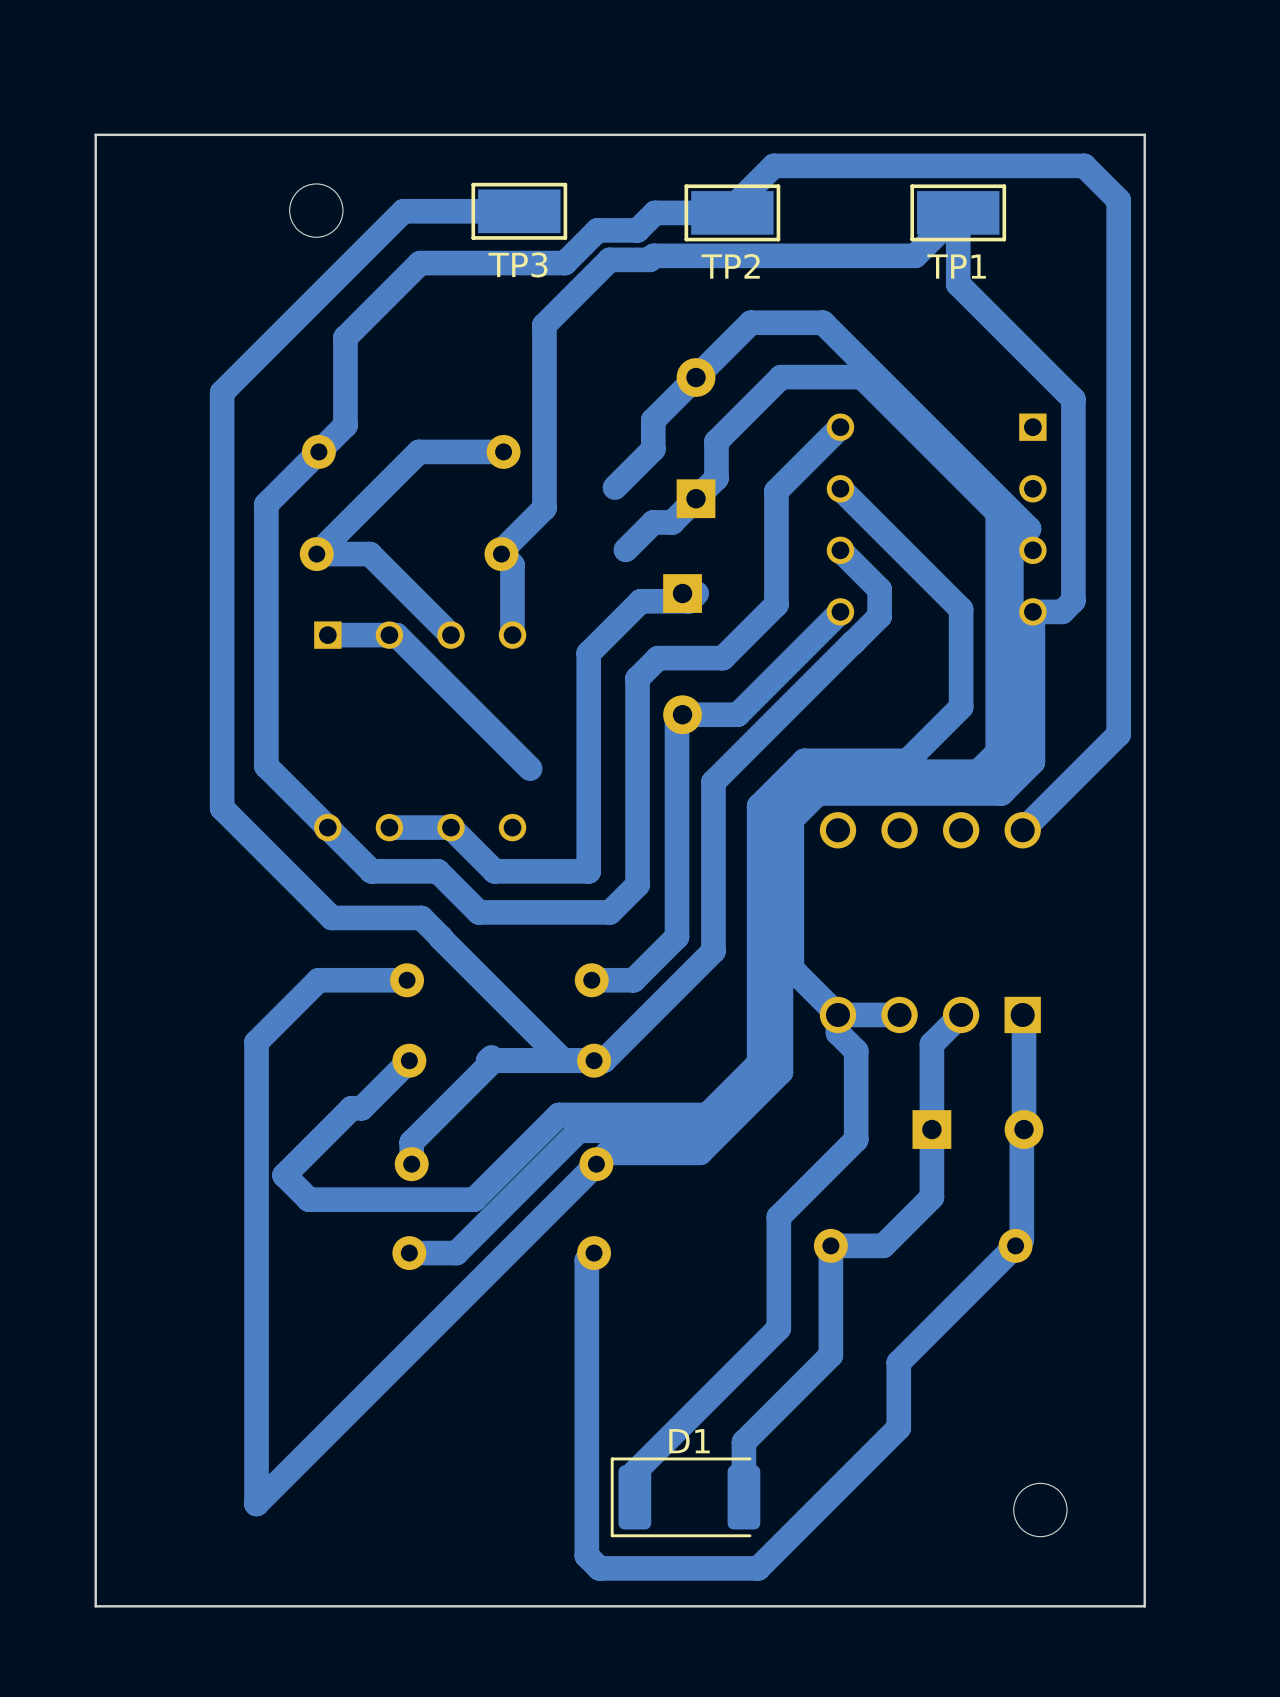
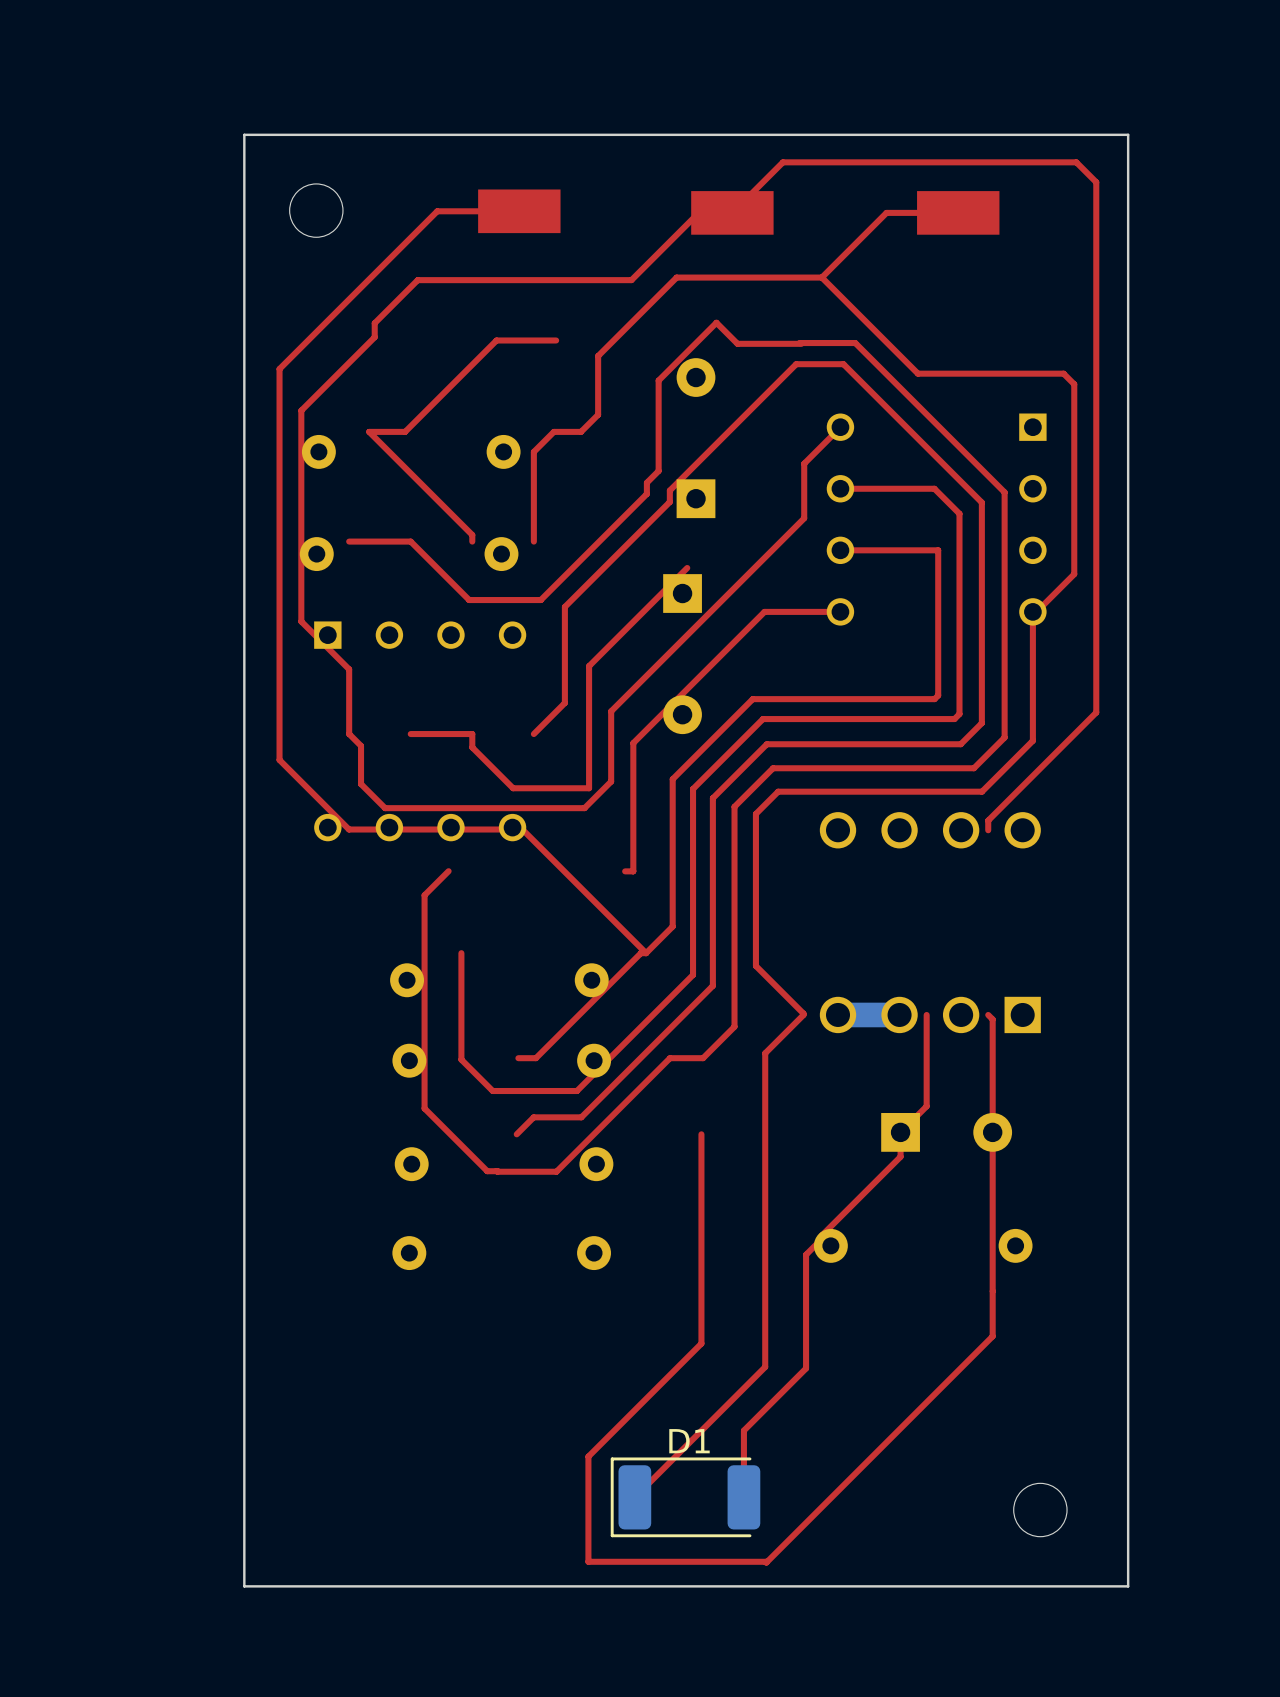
board edge: (1128, 134) (1144, 134) (1144, 1606) (95, 1606) (95, 134) (244, 134) -> (1128, 134) (1128, 1586) (244, 1586) (244, 134)
bottom track: (519, 211) (403, 211) (222, 392) (222, 808) (331, 917) (421, 917) (563, 1060) -> none
top track: none -> (519, 211) (437, 211) (279, 369) (279, 760) (349, 829) (522, 829) (646, 953)
TP3 side: bottom (519, 211) -> top (519, 211)
top track: none -> (732, 212) (782, 162) (1076, 162) (1096, 182) (1096, 712) (988, 820) (988, 830)
TP2 side: bottom (732, 212) -> top (732, 212)
top track: none -> (958, 212) (886, 212) (821, 277)
TP1 side: bottom (958, 212) -> top (958, 212)
top track: none -> (714, 214) (697, 214) (631, 280) (417, 280) (374, 323) (374, 337) (301, 410) (301, 621) (349, 669) (349, 734) (361, 745) (361, 784) (385, 808) (584, 808) (611, 781) (611, 711) (804, 518) (804, 463) (840, 427)
top track: none -> (821, 277) (676, 277) (598, 356) (598, 414) (581, 431) (553, 431) (533, 451) (533, 541)
top track: none -> (821, 277) (917, 373) (1063, 373) (1074, 384) (1074, 574) (1032, 615) (1032, 740) (982, 791) (778, 791) (755, 813) (755, 966) (803, 1013) (765, 1053) (765, 1367) (634, 1497)
top track: none -> (556, 340) (496, 340) (405, 431) (369, 431) (472, 534) (472, 541)
top track: none -> (799, 343) (855, 343) (1004, 492) (1004, 737) (973, 768) (773, 768) (734, 806) (734, 1026) (703, 1058) (670, 1058) (556, 1171) (496, 1170)
top track: none -> (801, 343) (737, 343) (716, 322) (658, 380) (658, 471) (646, 482) (646, 493) (540, 600) (469, 600) (410, 541) (349, 541)
bottom track: (840, 427) (776, 491) (776, 604) (722, 658) (658, 658) (637, 678) (637, 884) (610, 912) (478, 912) (437, 871) (371, 871) (266, 766) (266, 504) (345, 425) (345, 337) (420, 263) (564, 263) (597, 230) (637, 230) (655, 212) (732, 212) (732, 207) (773, 165) (1084, 165) (1118, 200) (1118, 734) (1022, 830) -> none
bottom track: (503, 451) (418, 451) (316, 554) (369, 554) (450, 635) -> none
bottom track: (614, 487) (653, 449) (653, 420) (750, 322) (823, 322) (1029, 528) (1023, 528) (1011, 541) (1011, 620) (1022, 631) (1022, 757) (996, 782) (813, 782) (780, 815) (780, 1072) (700, 1152) (607, 1152) (256, 1504) (256, 1042) (318, 980) (407, 980) -> none
bottom track: (840, 488) (961, 609) (961, 707) (907, 760) (804, 760) (759, 806) (759, 1063) (707, 1114) (558, 1114) (474, 1199) (308, 1199) (284, 1175) (351, 1108) (361, 1108) (407, 1062) (407, 1057) -> none
top track: none -> (840, 488) (934, 488) (959, 513) (959, 714) (954, 719) (762, 719) (693, 789) (693, 974) (576, 1091) (492, 1091) (461, 1059) (461, 953)
bottom track: (625, 549) (653, 522) (672, 522) (716, 478) (716, 441) (781, 377) (861, 377) (997, 512) (997, 752) (978, 771) (808, 771) (770, 810) (770, 1067) (706, 1130) (578, 1130) (456, 1253) (409, 1253) -> none
bottom track: (840, 550) (879, 589) (879, 616) (853, 642) -> none
top track: none -> (840, 550) (938, 550) (938, 695) (934, 699) (752, 699) (672, 779) (672, 926) (646, 953)
top track: none -> (687, 567) (589, 666) (589, 788) (513, 788) (472, 747) (472, 734) (410, 734)
bottom track: (696, 593) (688, 601) (640, 601) (588, 653) (588, 871) (494, 871) (450, 827) (389, 827) -> none
bottom track: (840, 611) (737, 714) (677, 714) (677, 936) (633, 980) (591, 980) -> none
top track: none -> (840, 611) (764, 611) (633, 743) (633, 871)
bottom track: (327, 635) (396, 635) (530, 768) -> none
bottom track: (512, 635) (512, 565) (501, 554) (501, 551) (544, 508) (544, 325) (609, 259) (649, 259) (653, 255) (915, 255) (958, 212) (958, 284) (1073, 399) (1073, 600) (1062, 611) (1032, 611) (1032, 762) (1001, 793) (817, 793) (791, 819) (791, 968) (838, 1014) (838, 1032) (856, 1051) (856, 1139) (778, 1216) (778, 1328) (634, 1472) (634, 1497) -> none
bottom track: (852, 642) (713, 782) (713, 951) (603, 1060) (488, 1060) (491, 1057) -> none
top track: none -> (533, 734) (564, 703) (564, 606) (669, 501) (669, 490) (796, 364) (843, 364) (981, 502) (981, 723) (960, 744) (766, 744) (712, 798) (712, 985) (581, 1117) (533, 1117) (516, 1134)
top track: none -> (448, 871) (424, 895) (424, 1108) (487, 1171) (497, 1171)
top track: none -> (633, 871) (625, 871)
top track: none -> (646, 953) (640, 953) (535, 1058) (518, 1058)
top track: none -> (926, 1014) (926, 1106) (900, 1132) (900, 1156) (822, 1235) (822, 1238) (806, 1254) (806, 1368) (743, 1430) (743, 1497)
bottom track: (961, 1014) (931, 1044) (931, 1197) (883, 1245) (830, 1245) (830, 1355) (743, 1442) (743, 1497) -> none
top track: none -> (988, 1014) (992, 1019) (992, 1336) (766, 1562)
bottom track: (1022, 1014) (1024, 1129) (1021, 1131) (1021, 1239) (898, 1362) (898, 1427) (758, 1568) (599, 1568) (586, 1555) (586, 1260) (594, 1253) -> none
bottom track: (493, 1060) (411, 1142) (411, 1164) -> none
part position: (977, 1129) -> (946, 1132)
top track: none -> (701, 1134) (701, 1343) (588, 1456) (588, 1561) (766, 1562)

